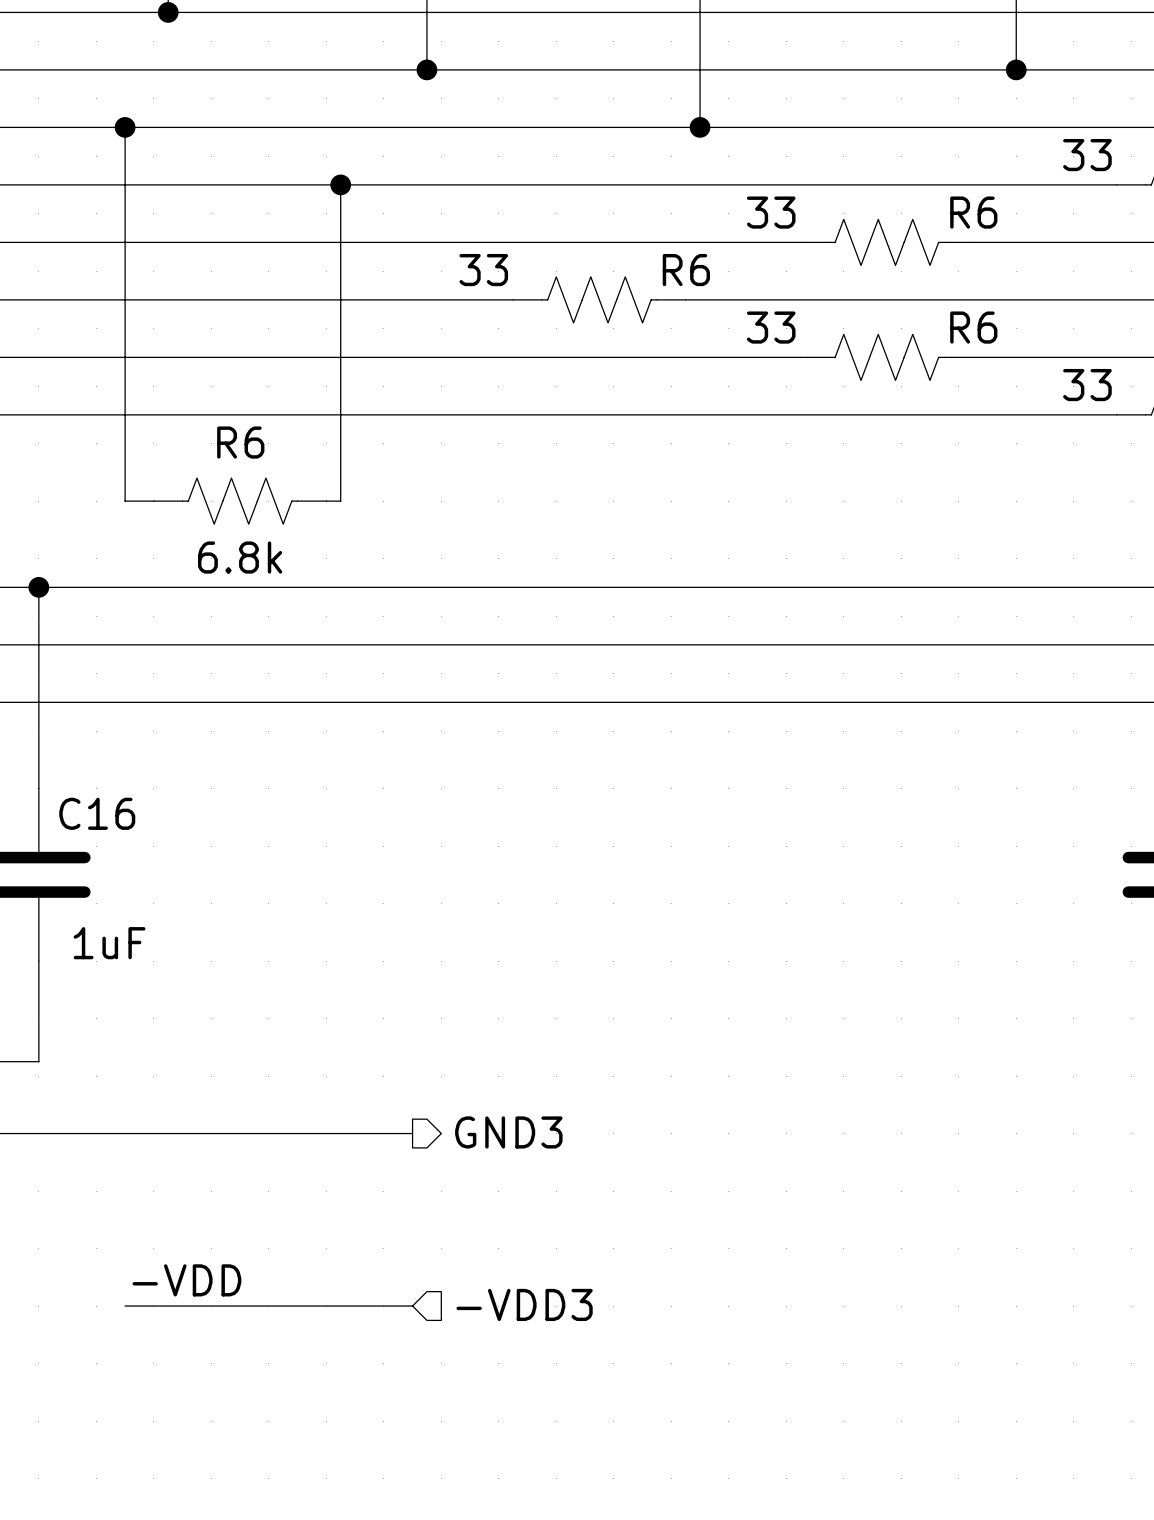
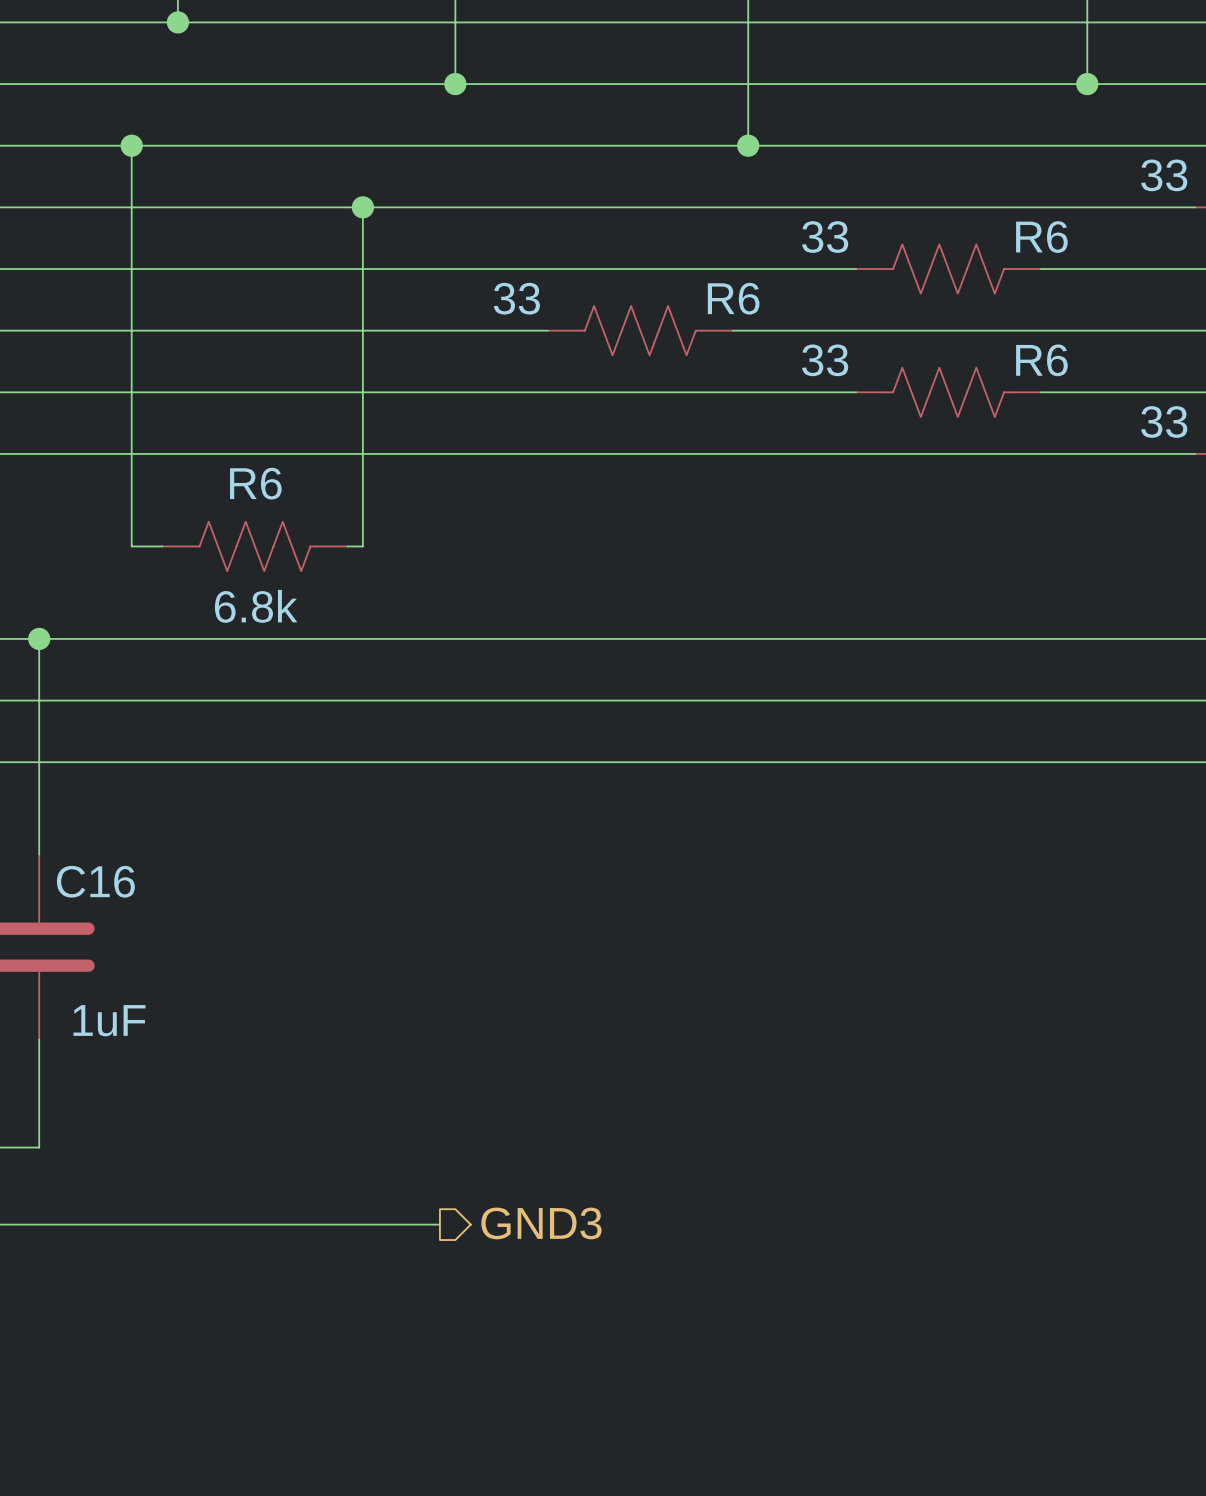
label: -VDD (186, 1280) -> none
hierarchical label: -VDD3 (524, 1304) -> none
wire: (125, 1306) (412, 1306) -> none

